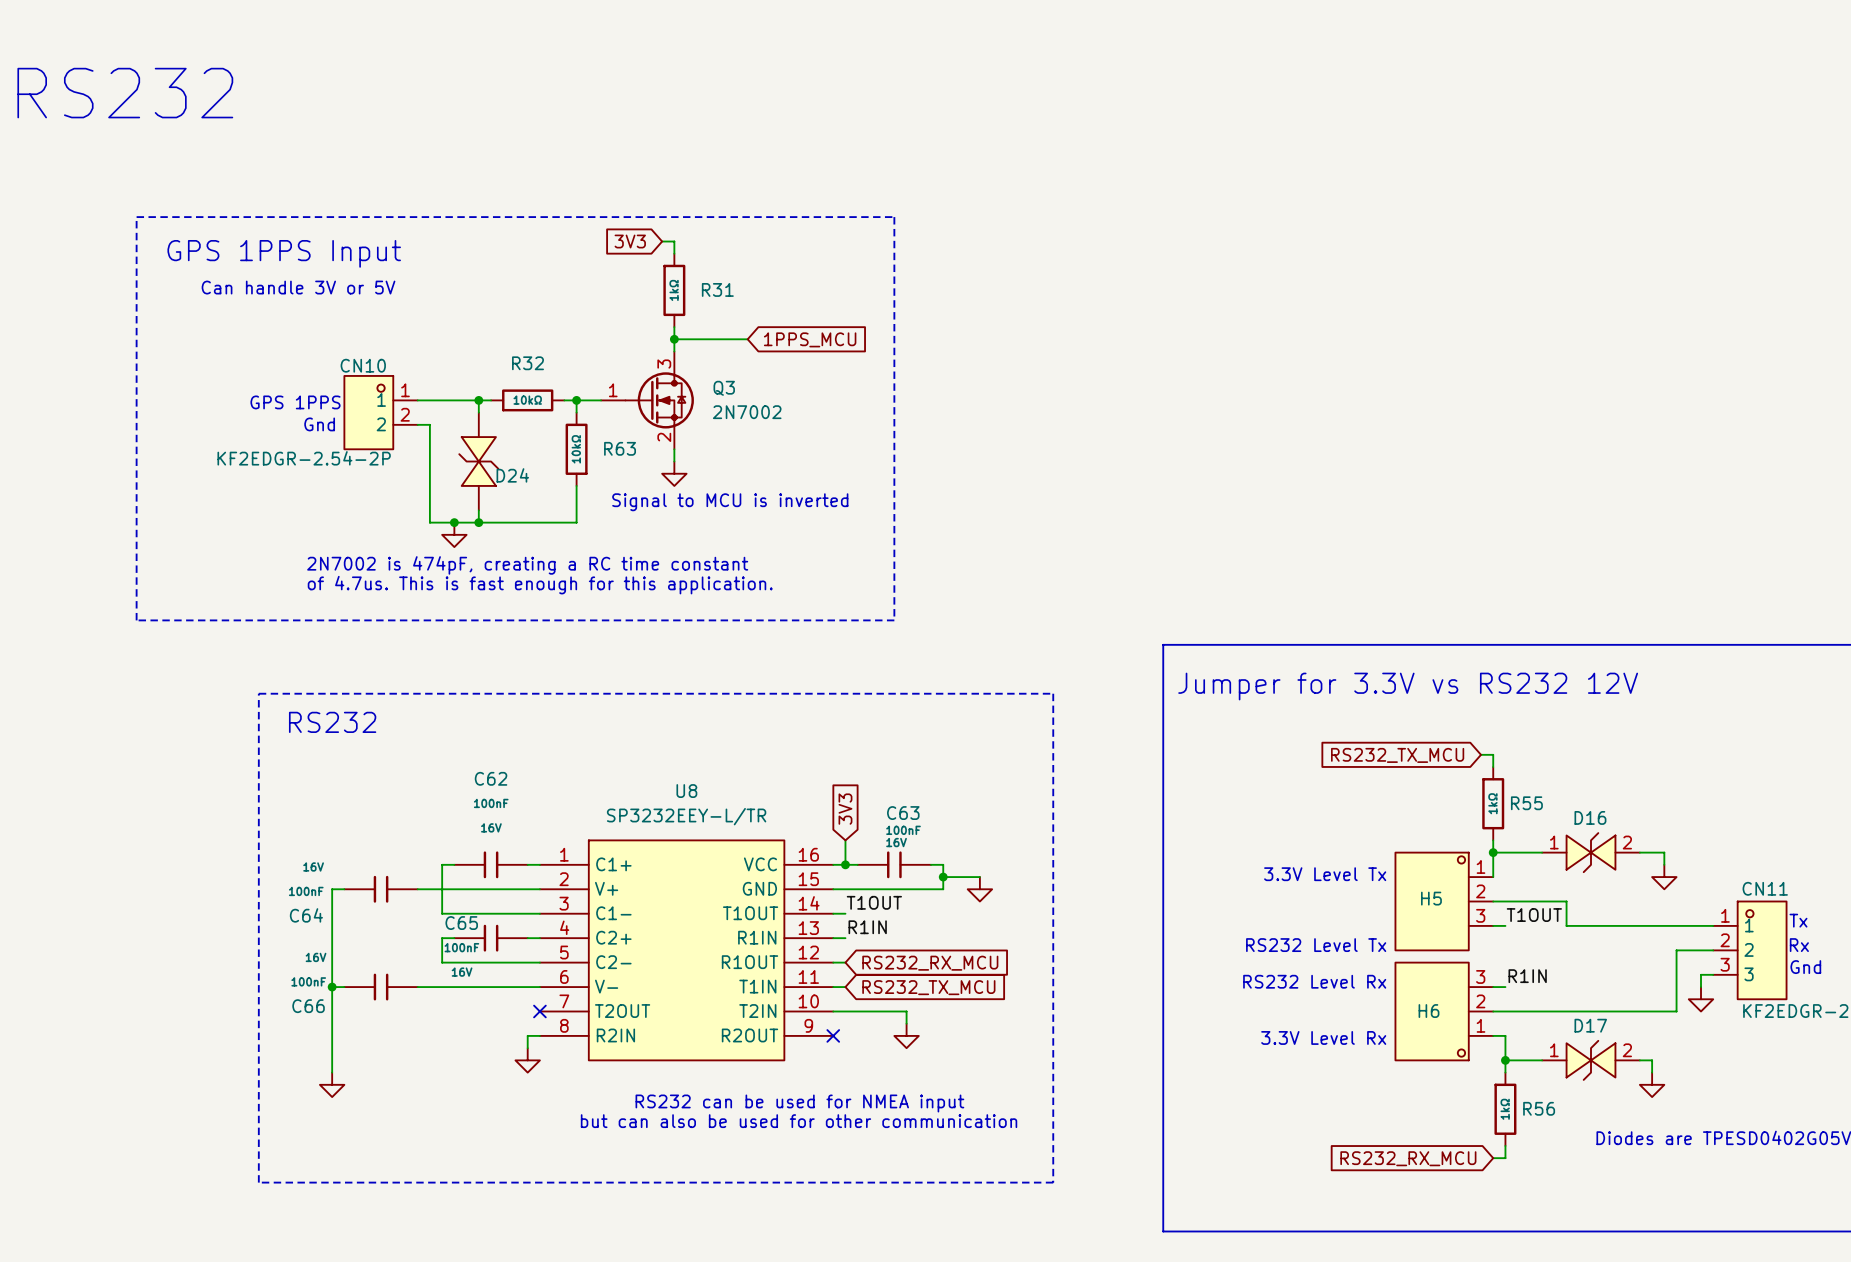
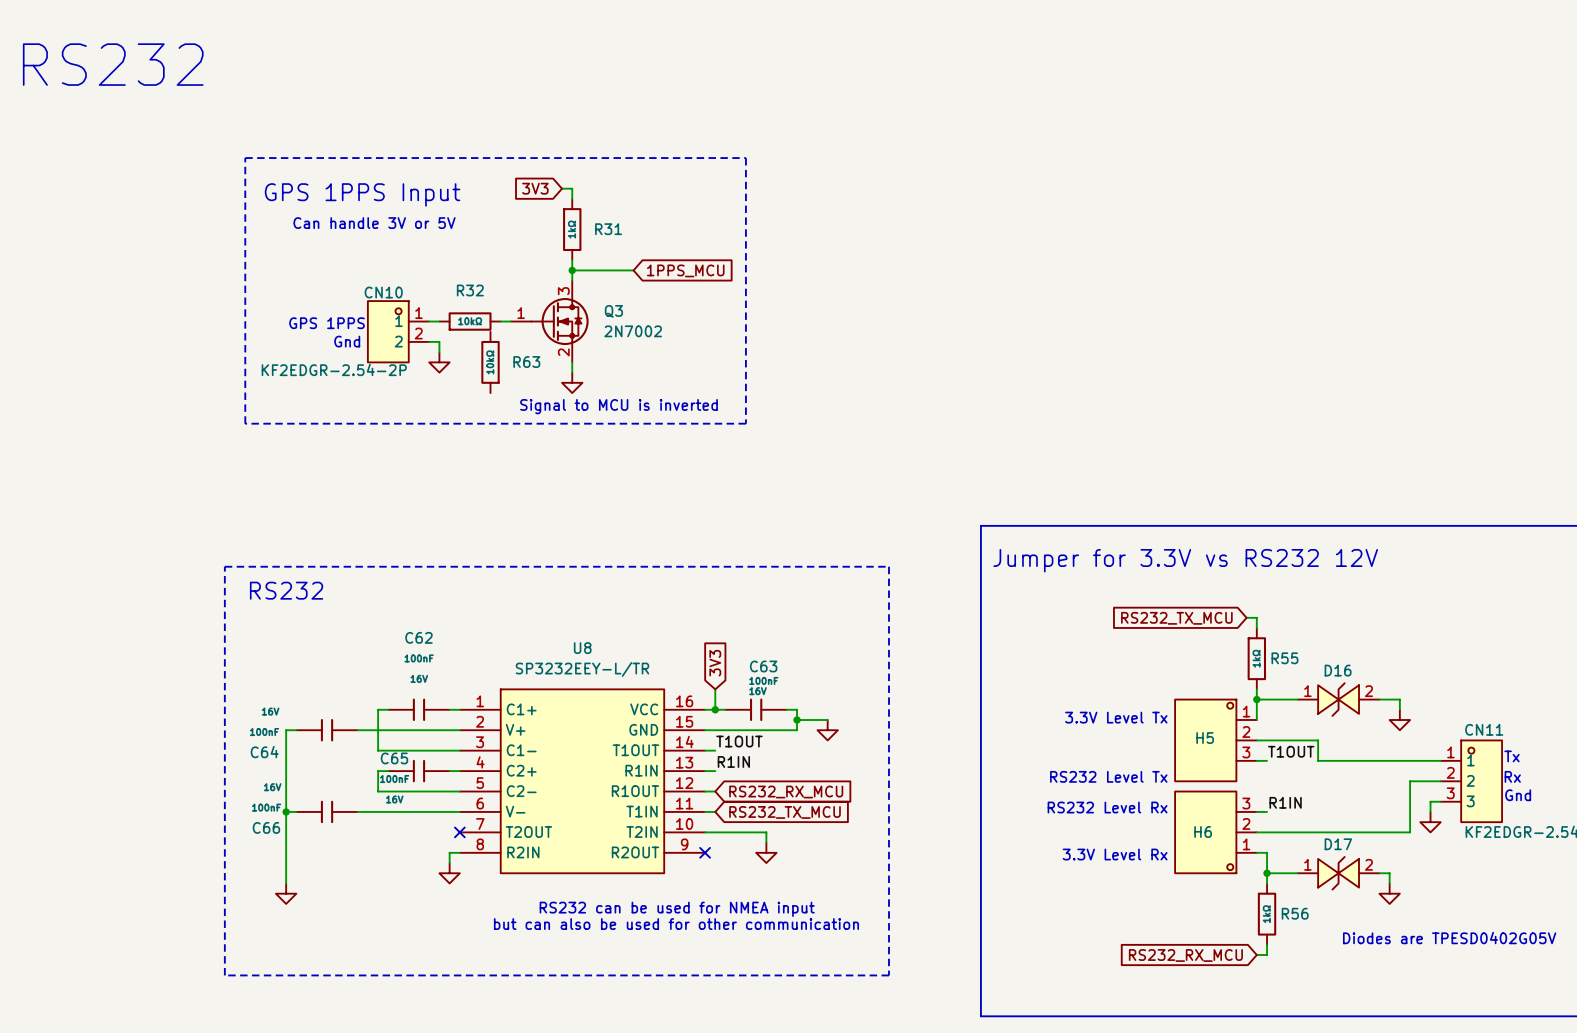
line: (136, 217) (894, 217) (894, 620) (136, 620) (136, 217) -> (245, 158) (245, 423) (745, 423) (745, 158) (245, 158)
text position: GPS 1PPS Input (284, 253) -> GPS 1PPS Input (362, 194)
text position: Can handle 3V or 5V (298, 287) -> Can handle 3V or 5V (374, 223)
junction: (478, 400) -> none
wire: none -> (429, 321) (439, 321)
R32 position: (527, 400) -> (470, 321)
junction: (576, 400) -> none
text position: GPS 1PPS (295, 402) -> GPS 1PPS (327, 323)
CN10 position: (381, 412) -> (398, 331)
text position: Gnd (319, 424) -> Gnd (347, 341)
wire: (417, 424) (429, 424) (429, 522) (576, 522) (576, 485) -> none
wire: none -> (429, 341) (439, 341) (439, 352)
D24: (478, 461) -> none
wire: (478, 510) (478, 522) -> none
junction: (454, 522) -> none
junction: (478, 522) -> none
power symbol position: (454, 534) -> (439, 362)
text: 2N7002 is 474pF, creating a RC time constant (527, 565) -> none
text: of 4.7us. This is fast enough for this application. (540, 585) -> none

